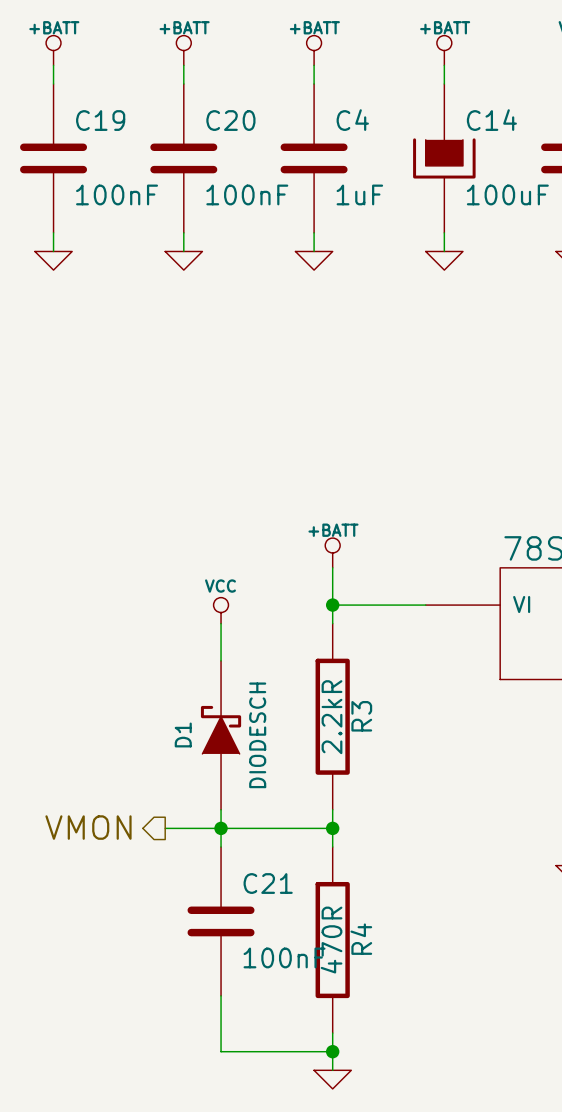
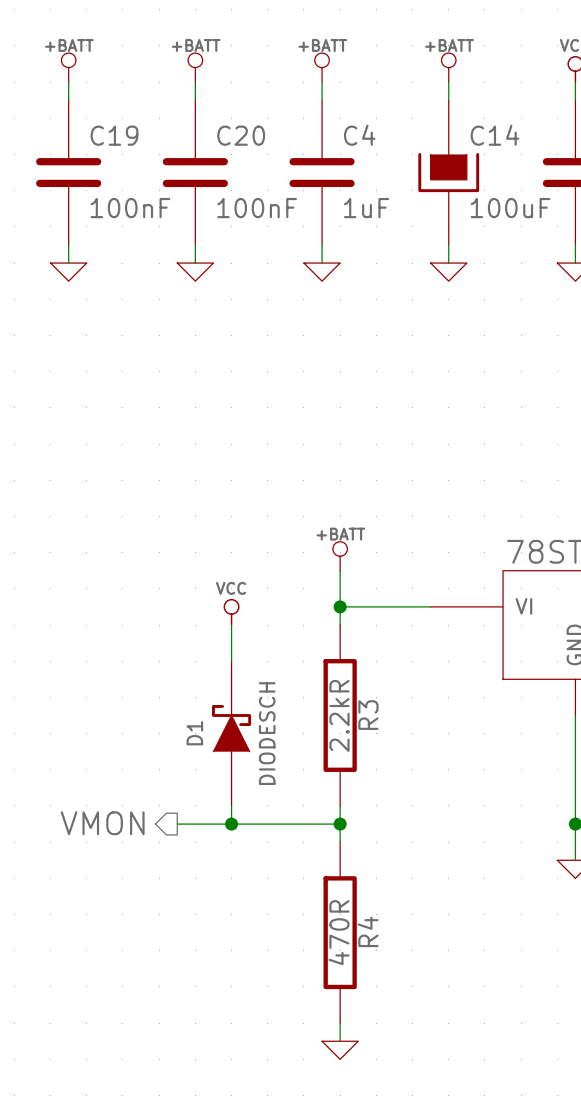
wire: (221, 828) (221, 846) -> none
C21: 100nF (221, 921) -> none
wire: (221, 995) (221, 1051) (332, 1051) (332, 1070) -> none
junction: (332, 1051) -> none
power symbol position: (332, 1079) -> (340, 1050)

